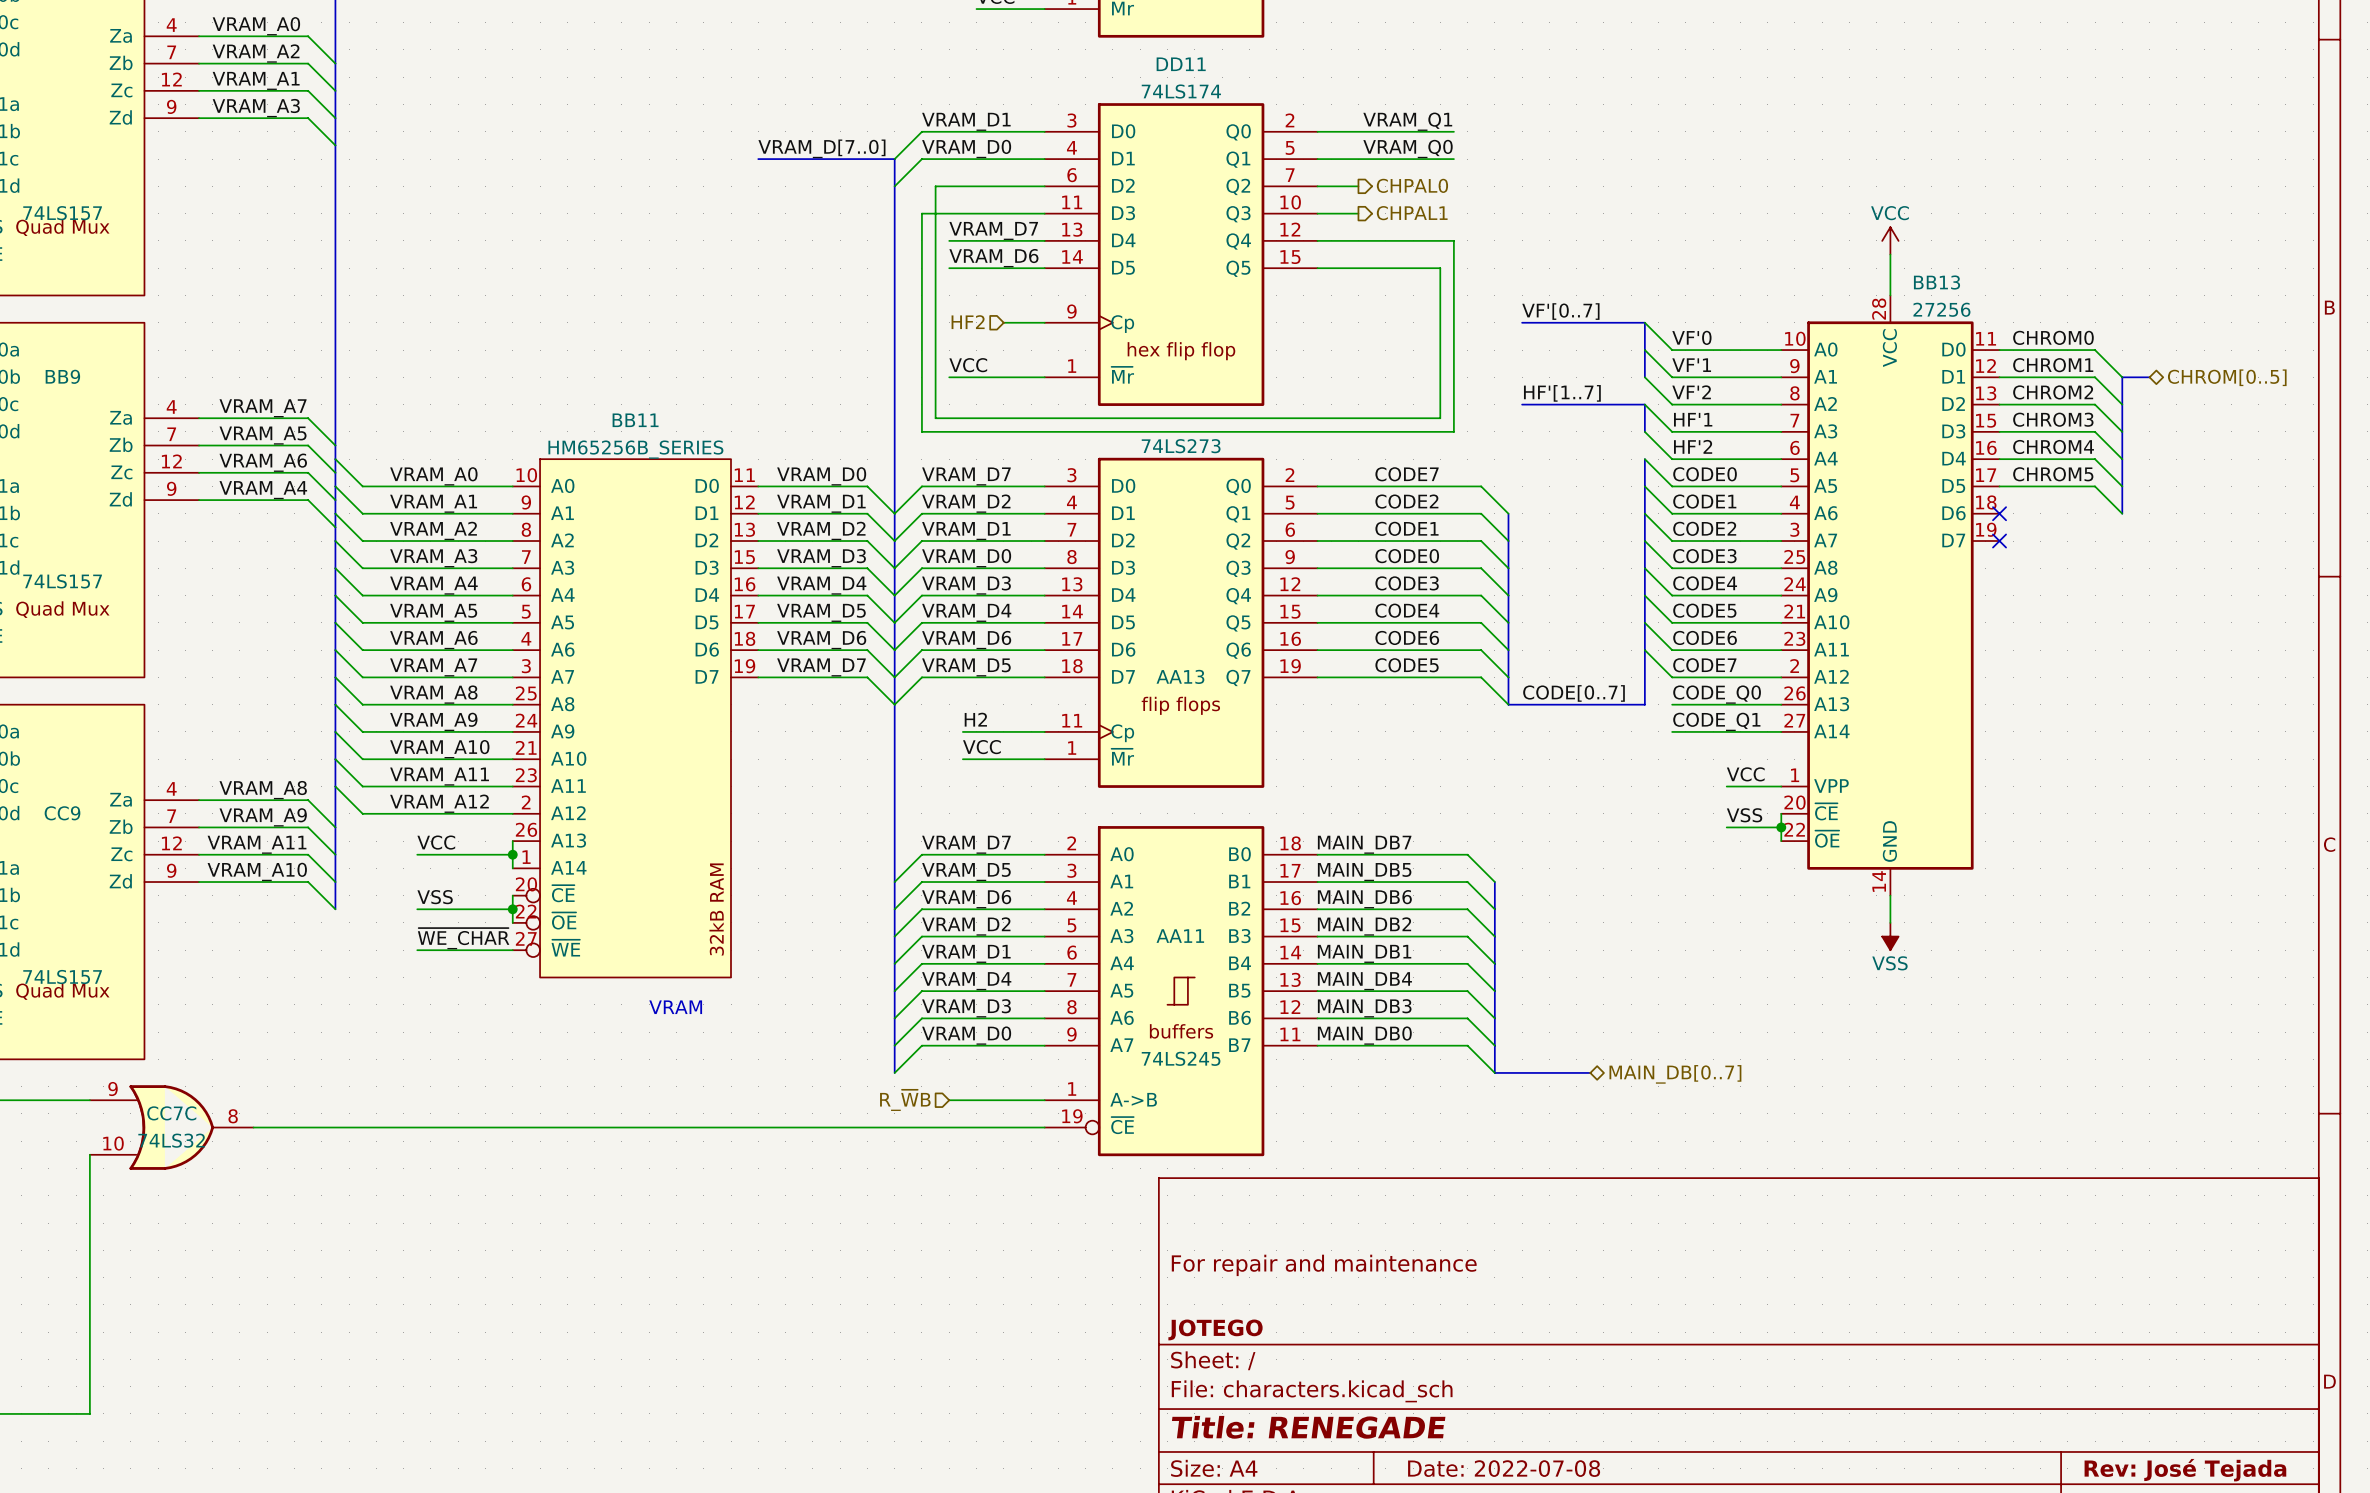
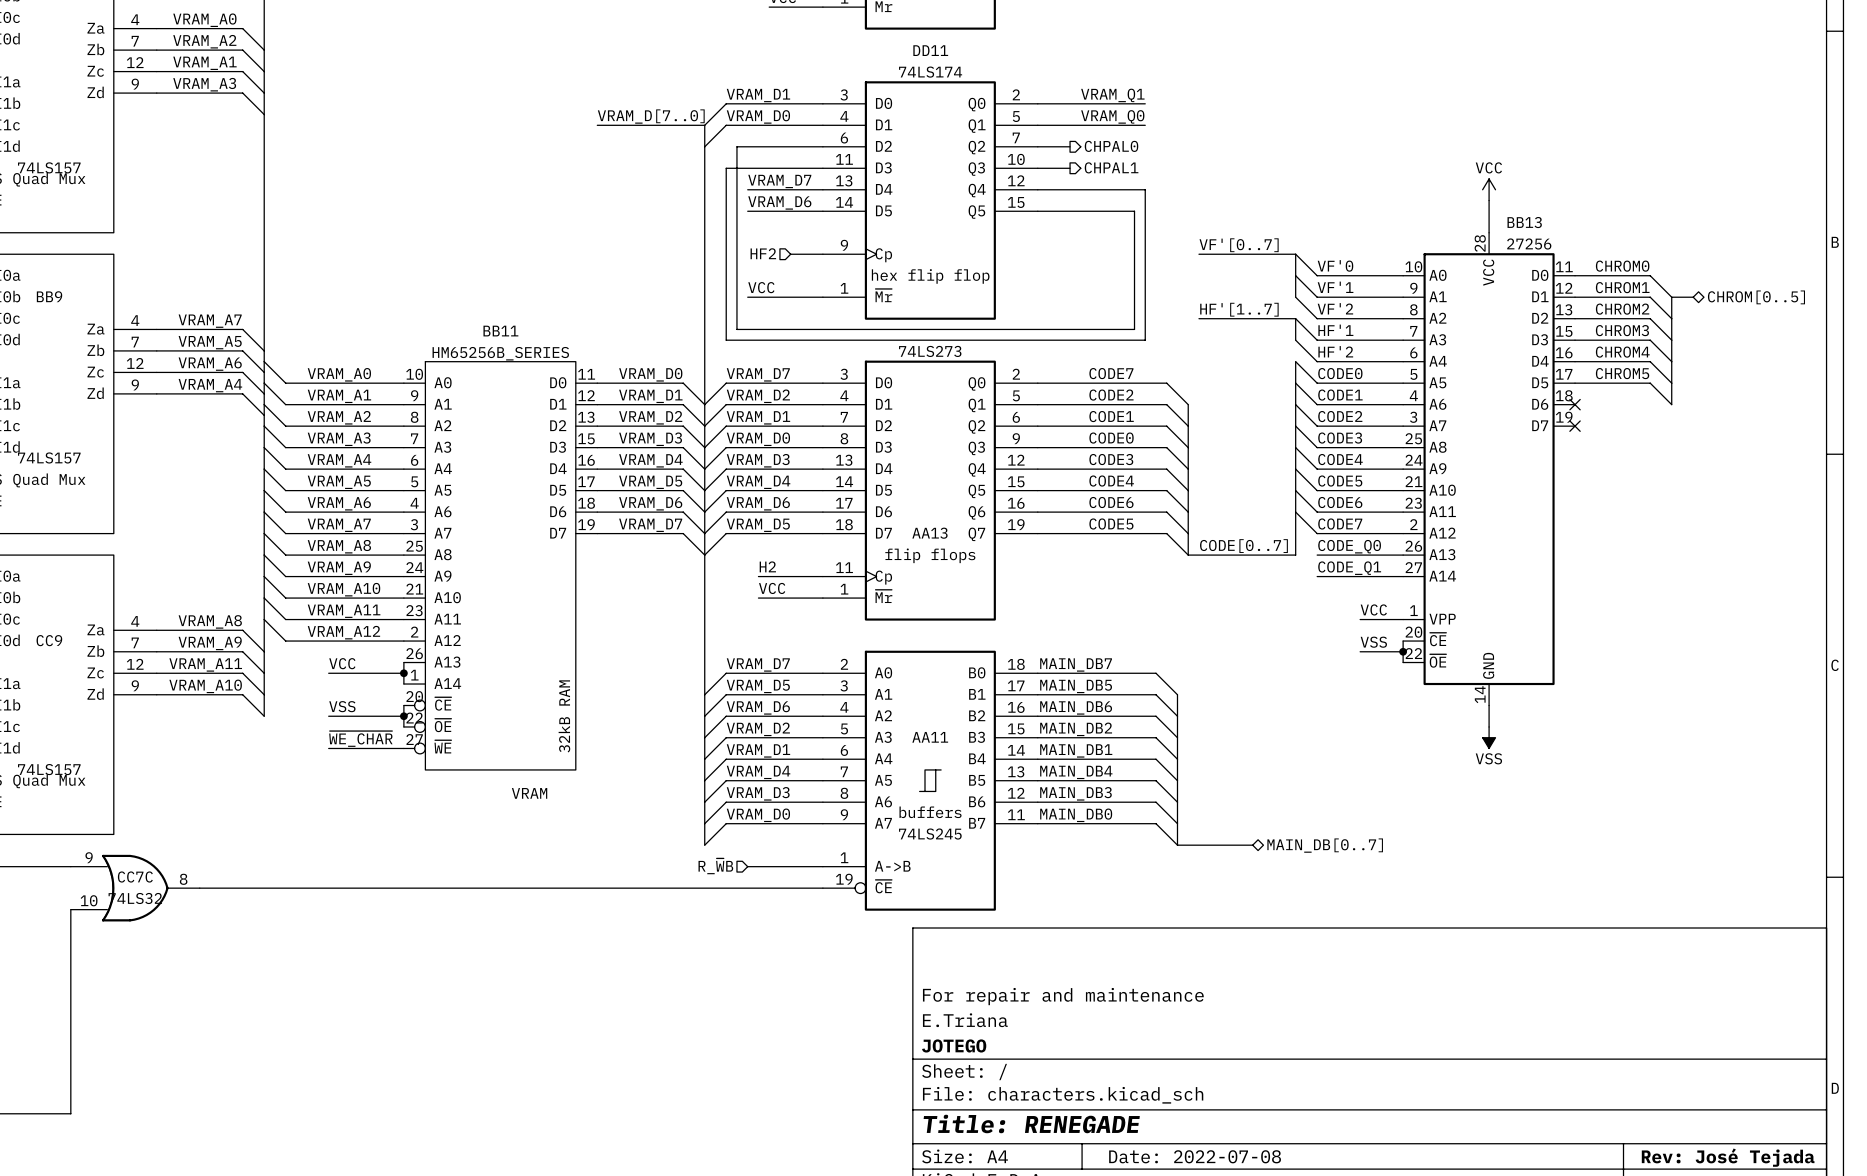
title block: none -> E.Triana (965, 1020)

